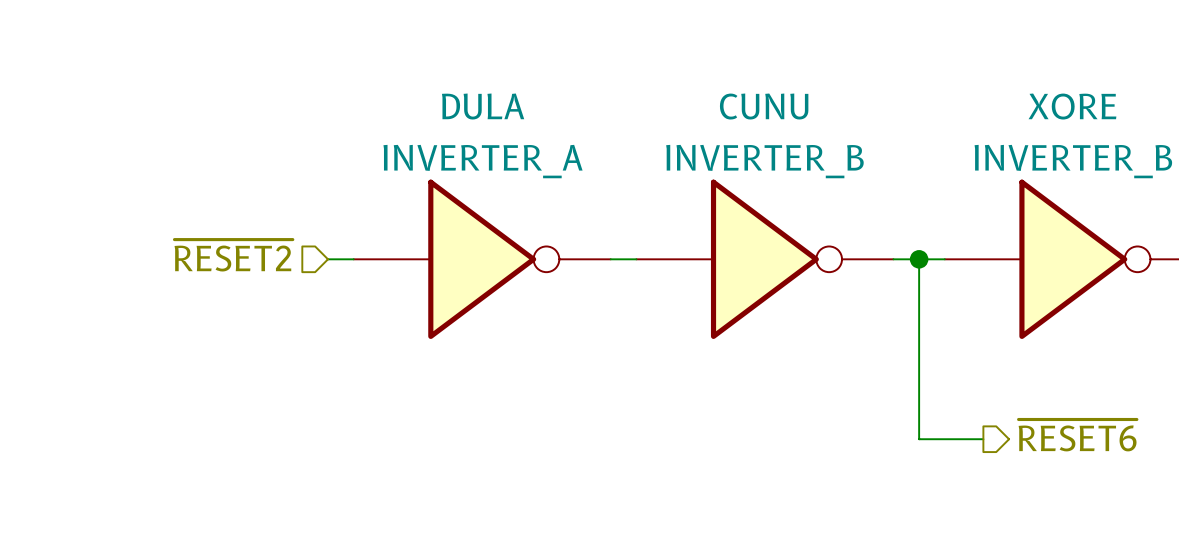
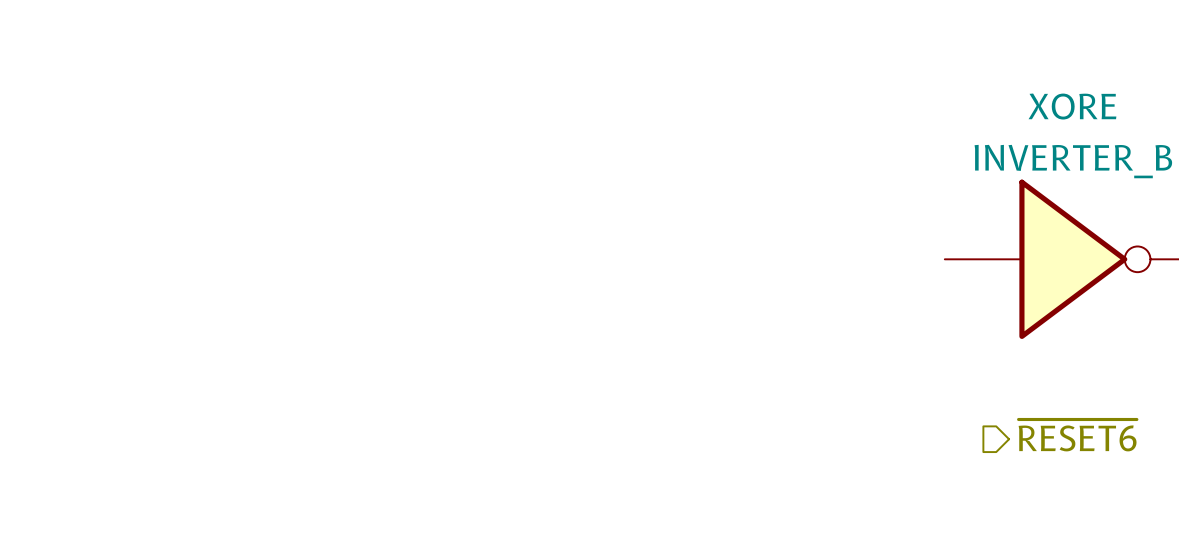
hierarchical label: ~{RESET2} (233, 255) -> none
wire: (328, 259) (353, 259) -> none
DULA: INVERTER_A (482, 259) -> none
wire: (610, 259) (636, 259) -> none
CUNU: INVERTER_B (764, 259) -> none
wire: (893, 259) (944, 259) -> none
wire: (919, 259) (919, 439) (983, 439) -> none
junction: (919, 259) -> none

